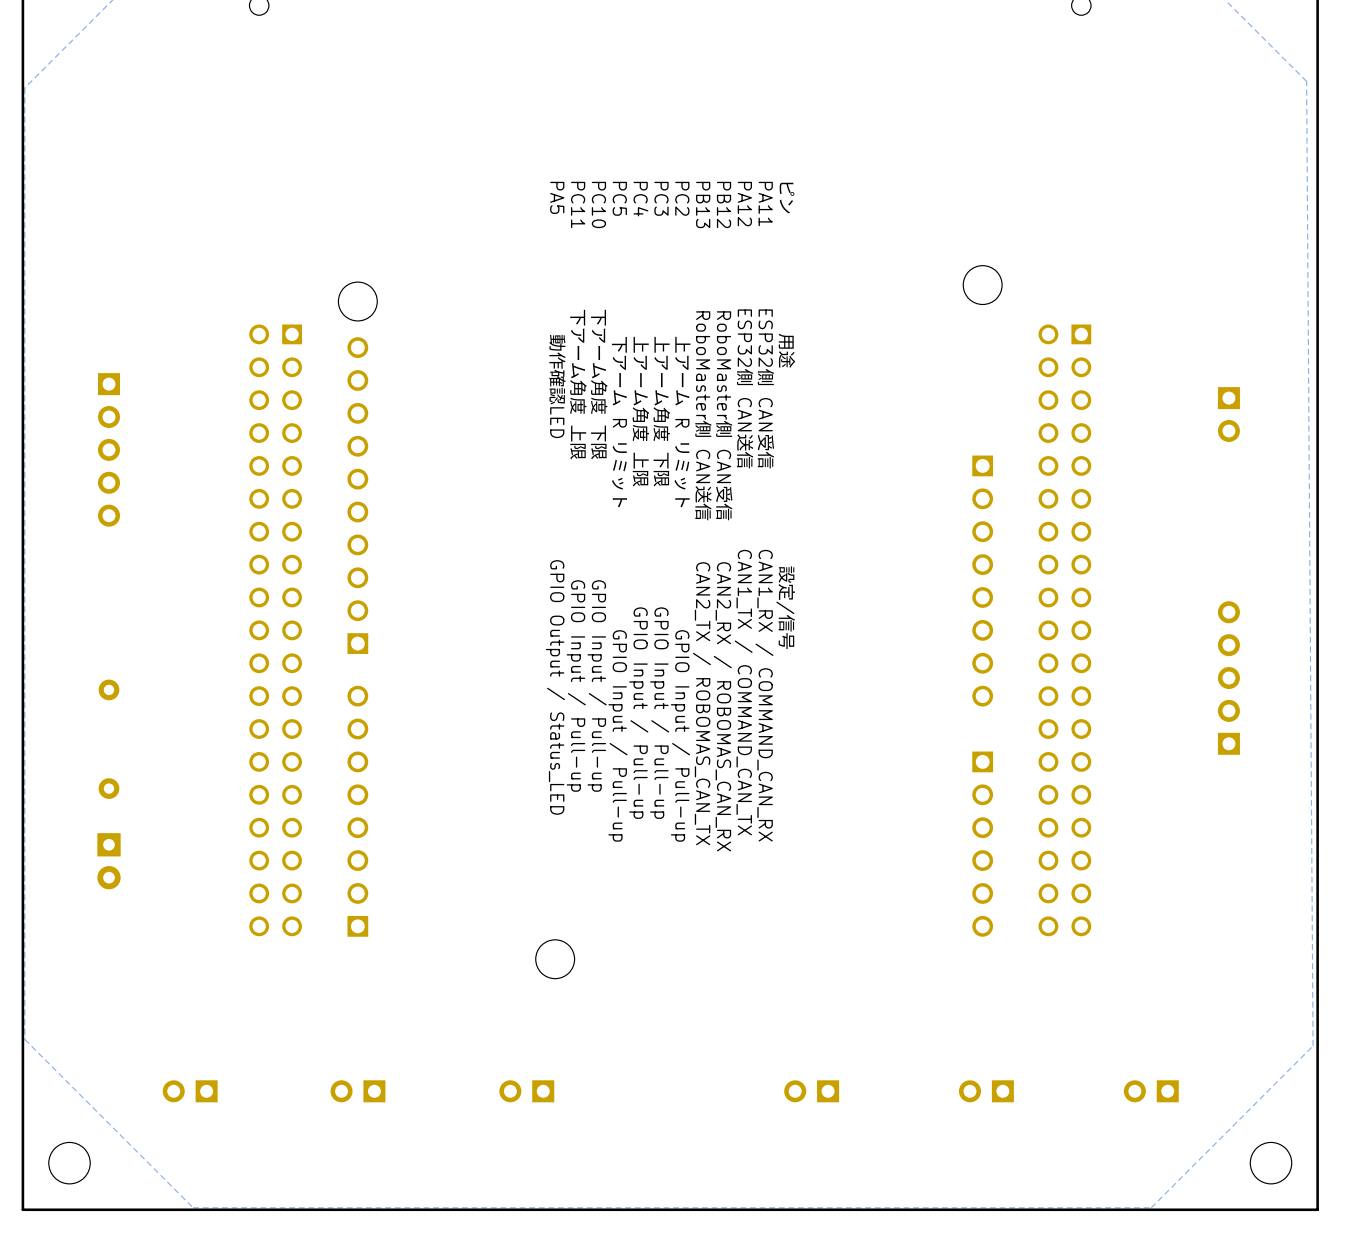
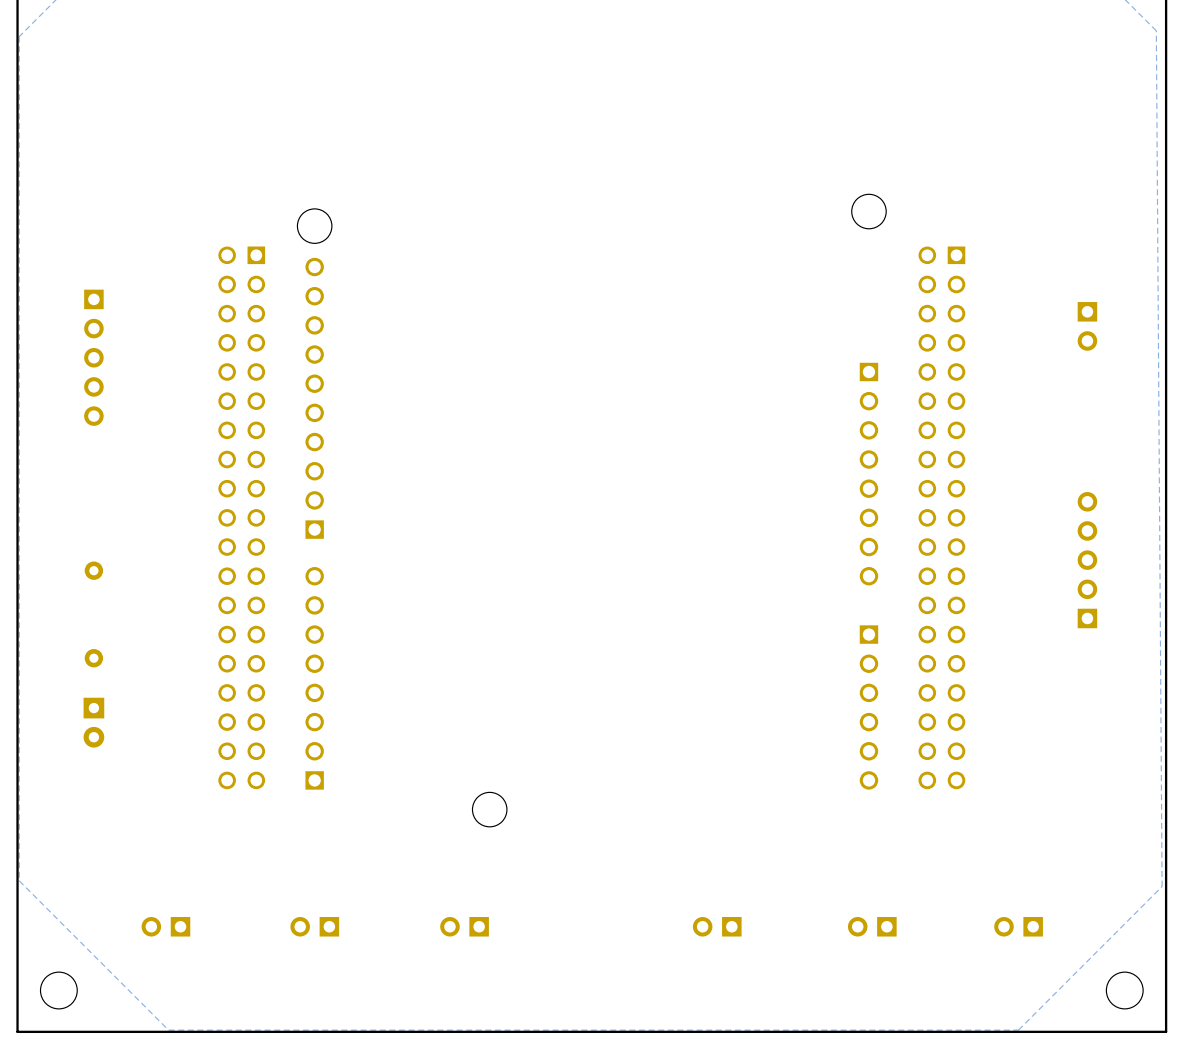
text: ピン 用途 設定/信号 (785, 415) -> none
text: PC11 下アーム角度 上限 GPIO Input / Pull-up (576, 486) -> none
text: PC10 下アーム角度 下限 GPIO Input / Pull-up (597, 486) -> none
text: PA5 動作確認LED GPIO Output / Status_LED (556, 498) -> none
text: PC4 上アーム角度 上限 GPIO Input / Pull-up (639, 500) -> none
text: PC3 上アーム角度 下限 GPIO Input / Pull-up (660, 500) -> none
text: PA12 ESP32側 CAN送信 CAN1_TX / COMMAND_CAN_TX (744, 508) -> none
text: PC5 下アーム R リミット GPIO Input / Pull-up (618, 511) -> none
text: PC2 上アーム R リミット GPIO Input / Pull-up (680, 511) -> none
text: PA11 ESP32側 CAN受信 CAN1_RX / COMMAND_CAN_RX (765, 511) -> none
text: PB13 RoboMaster側 CAN送信 CAN2_TX / ROBOMAS_CAN_TX (702, 513) -> none
text: PB12 RoboMaster側 CAN受信 CAN2_RX / ROBOMAS_CAN_RX (723, 516) -> none

